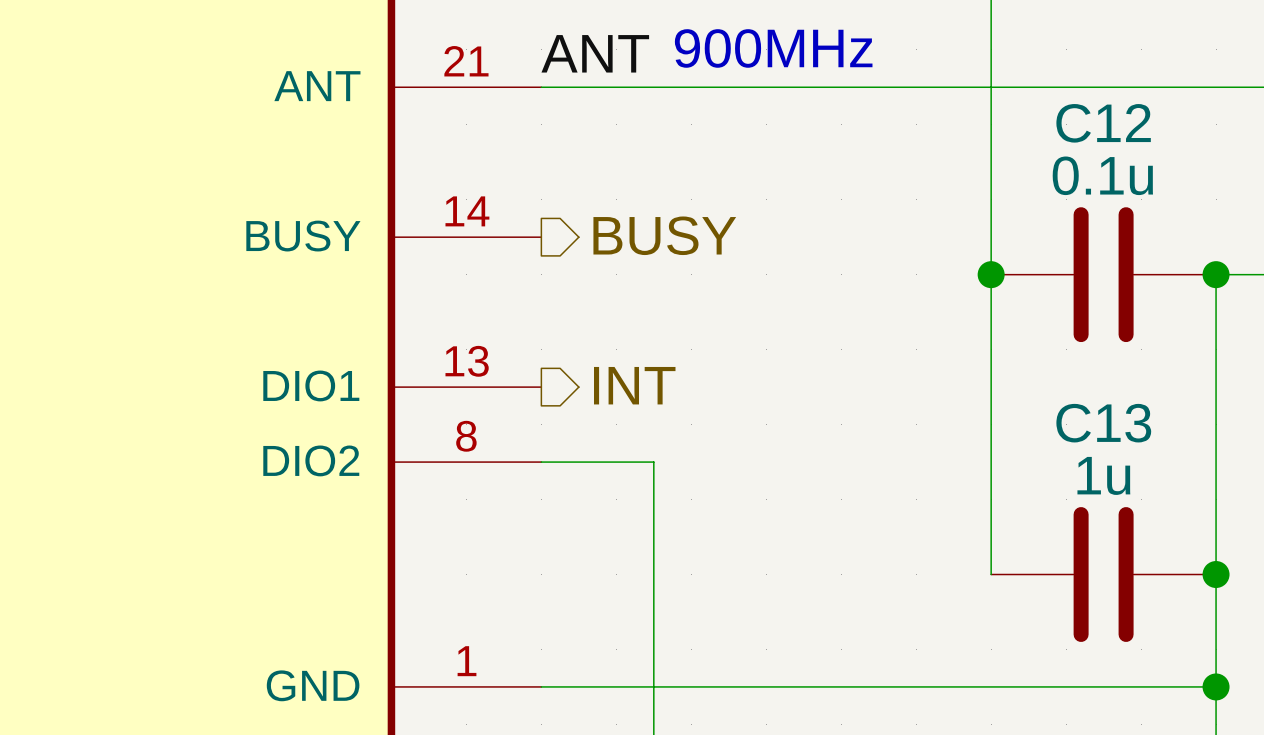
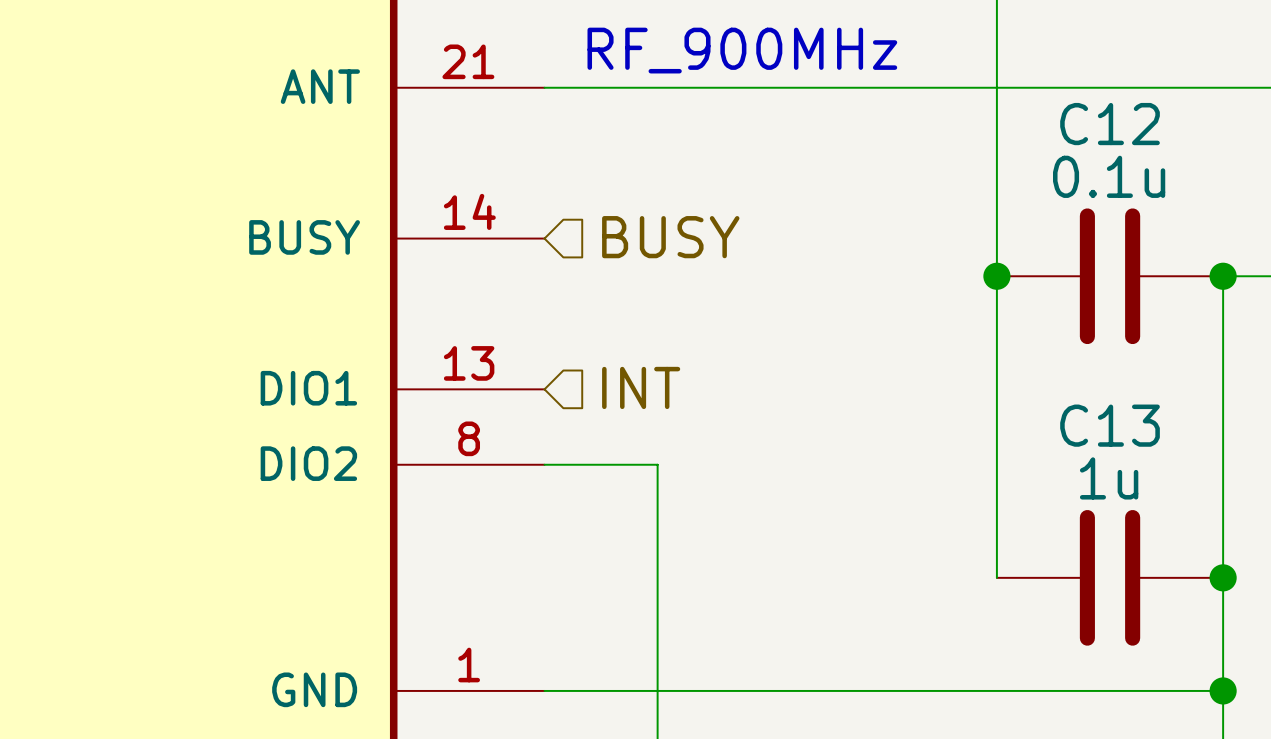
text: 900MHz (773, 48) -> RF_900MHz (742, 50)
label: ANT (595, 53) -> none
hierarchical label shape: output (664, 235) -> input (670, 237)
hierarchical label shape: output (634, 385) -> input (641, 387)

